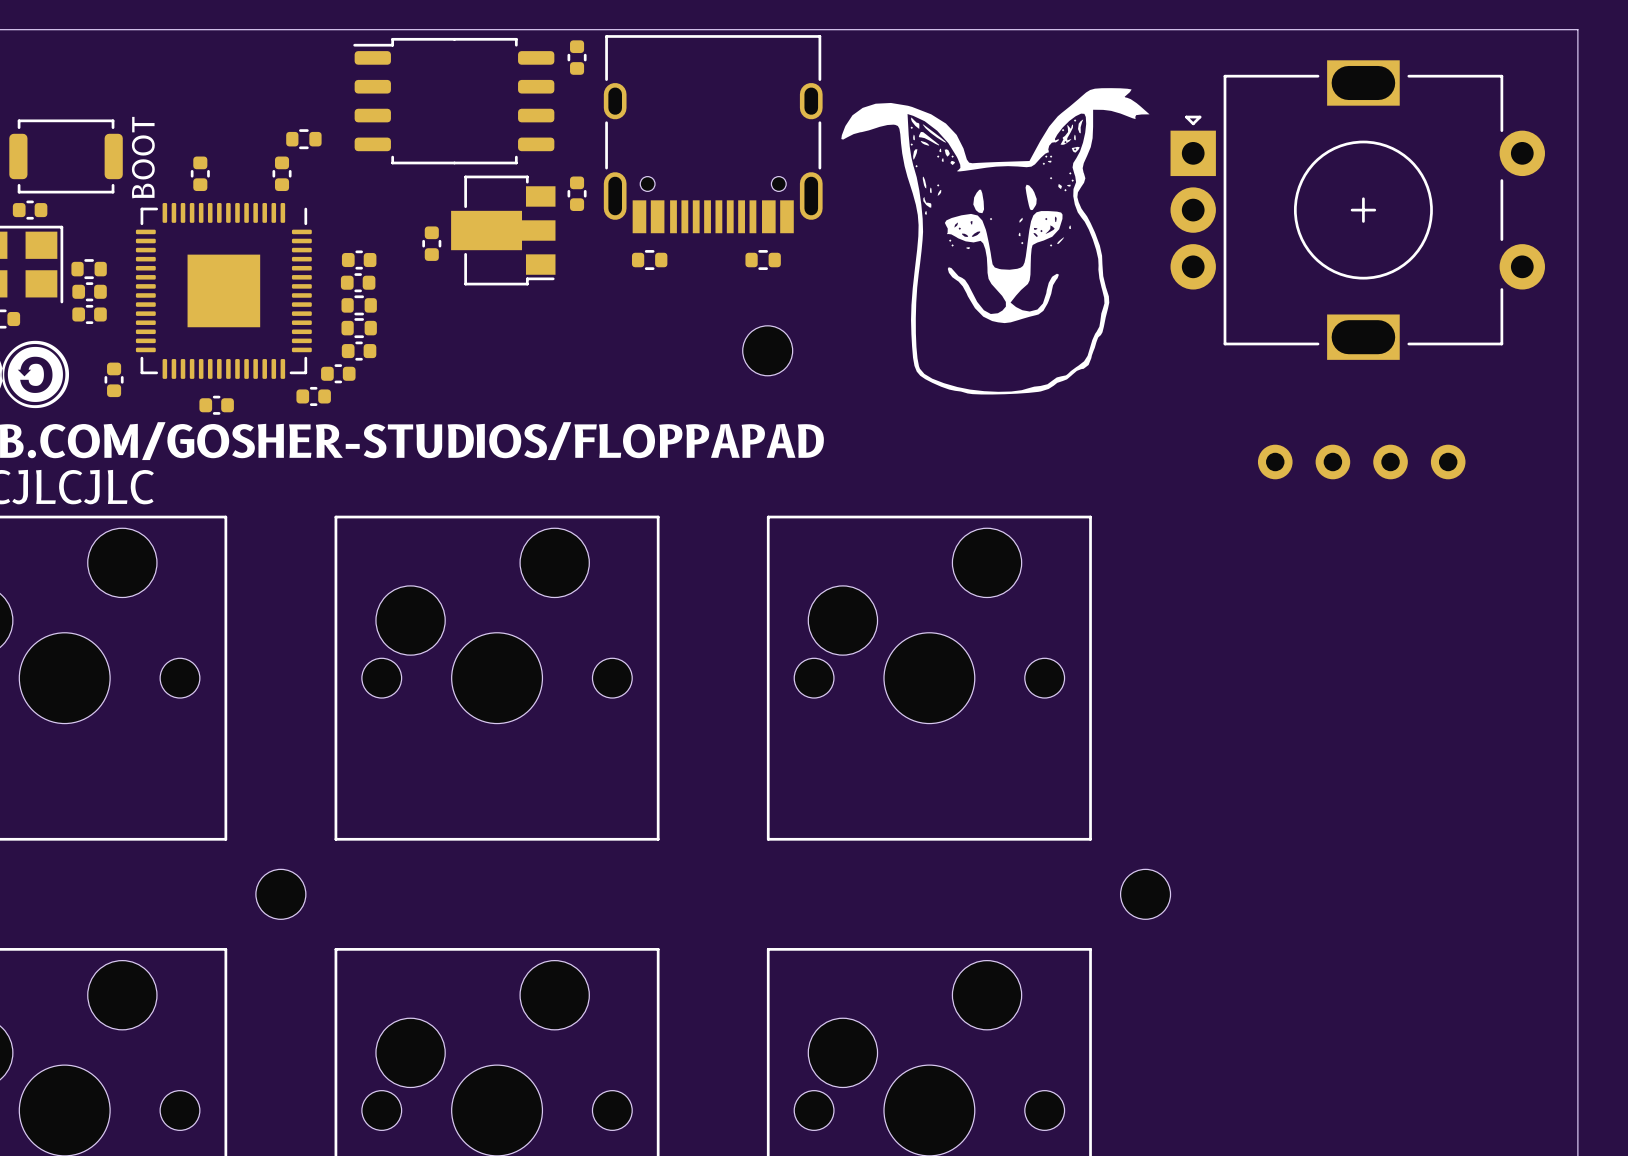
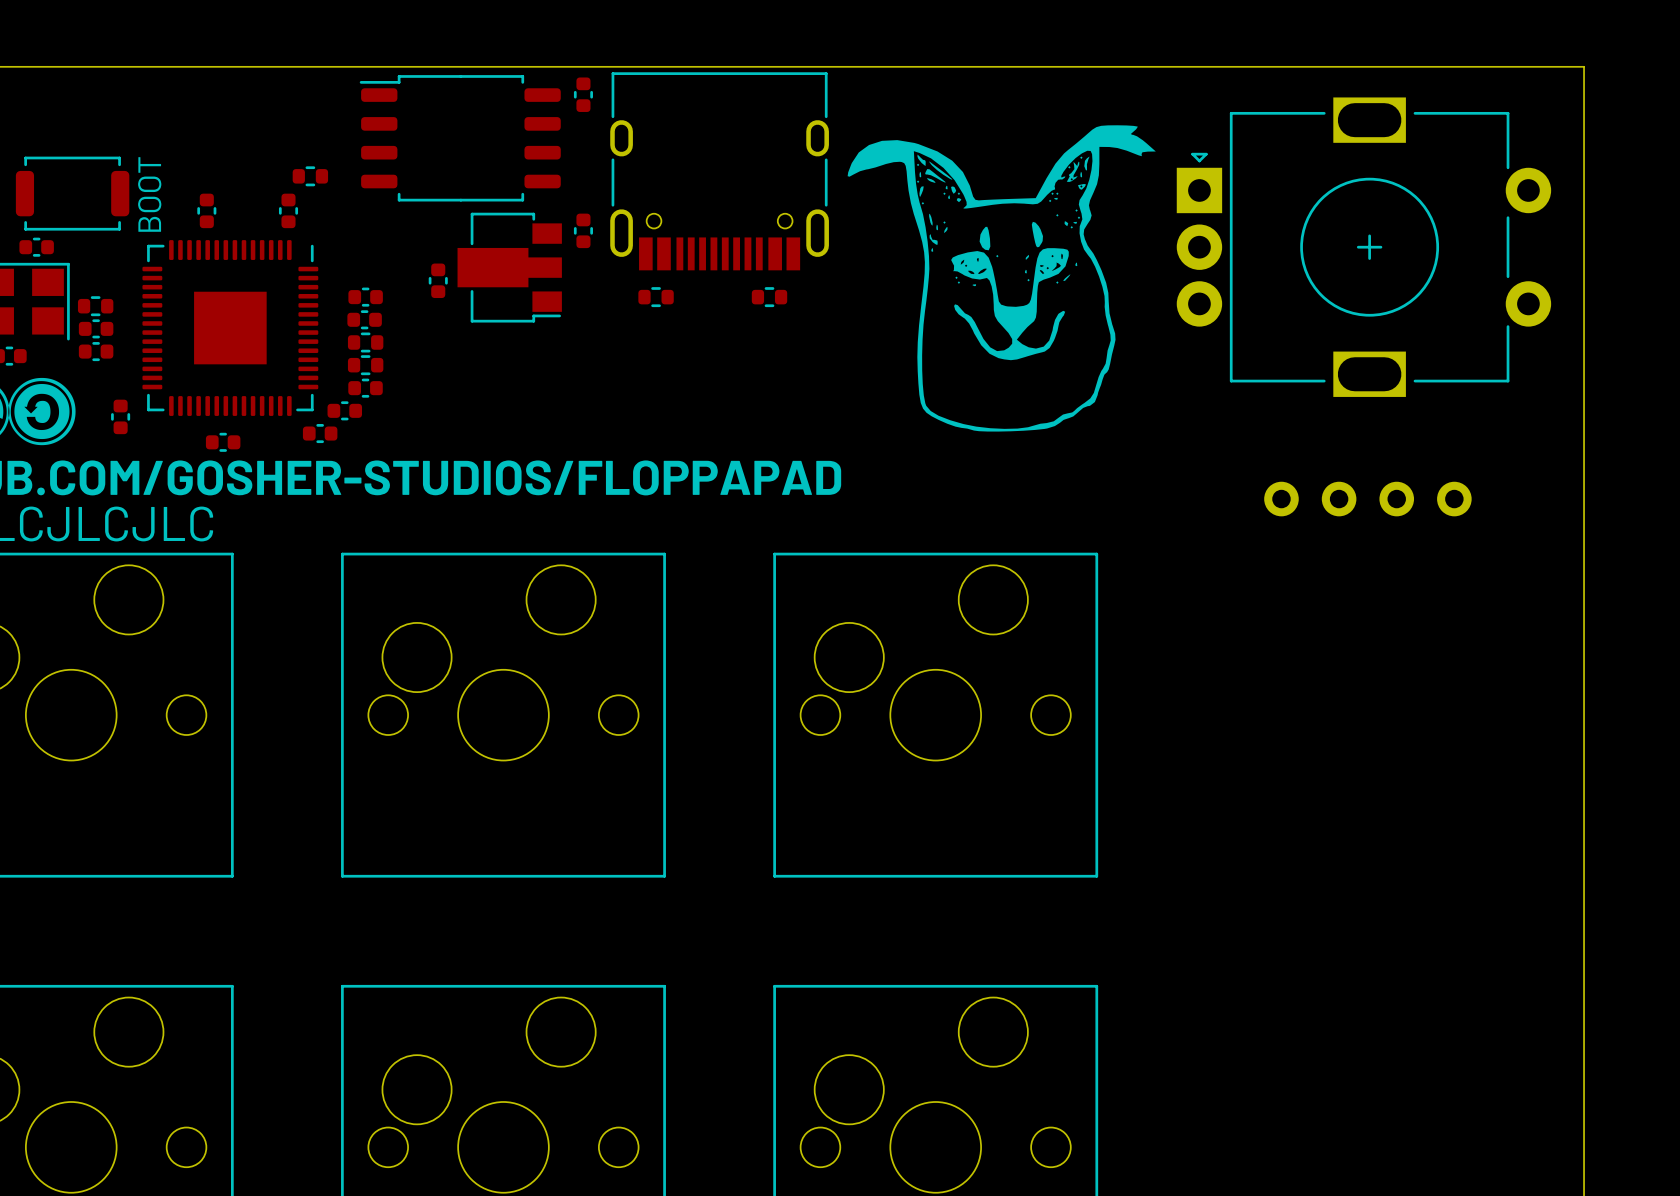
part: (767, 350) -> none
part: (280, 894) -> none
part: (1145, 894) -> none

